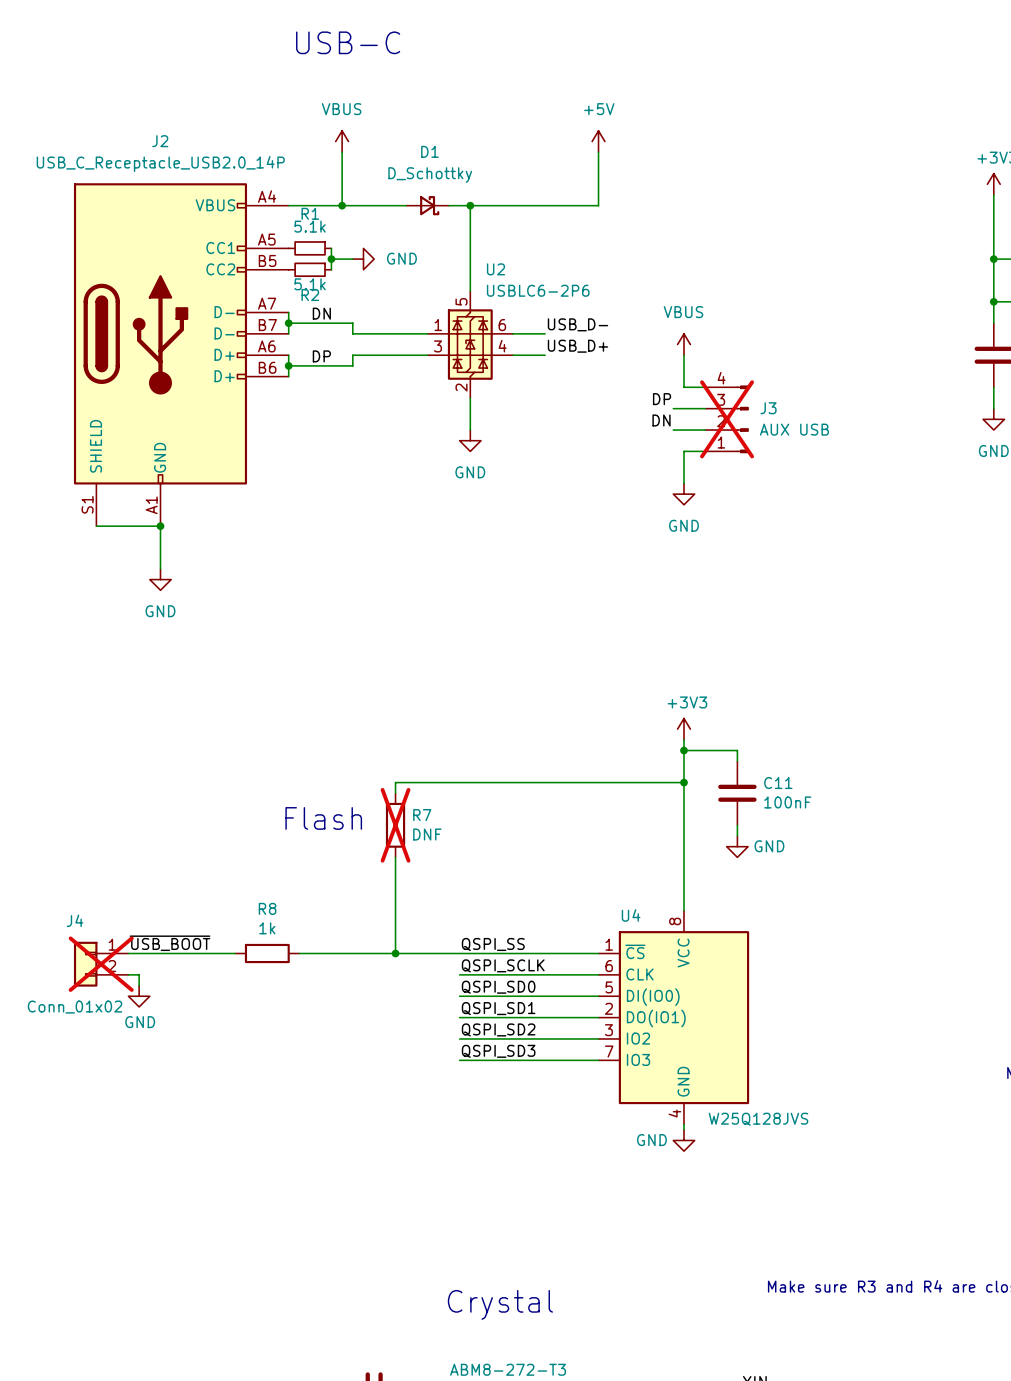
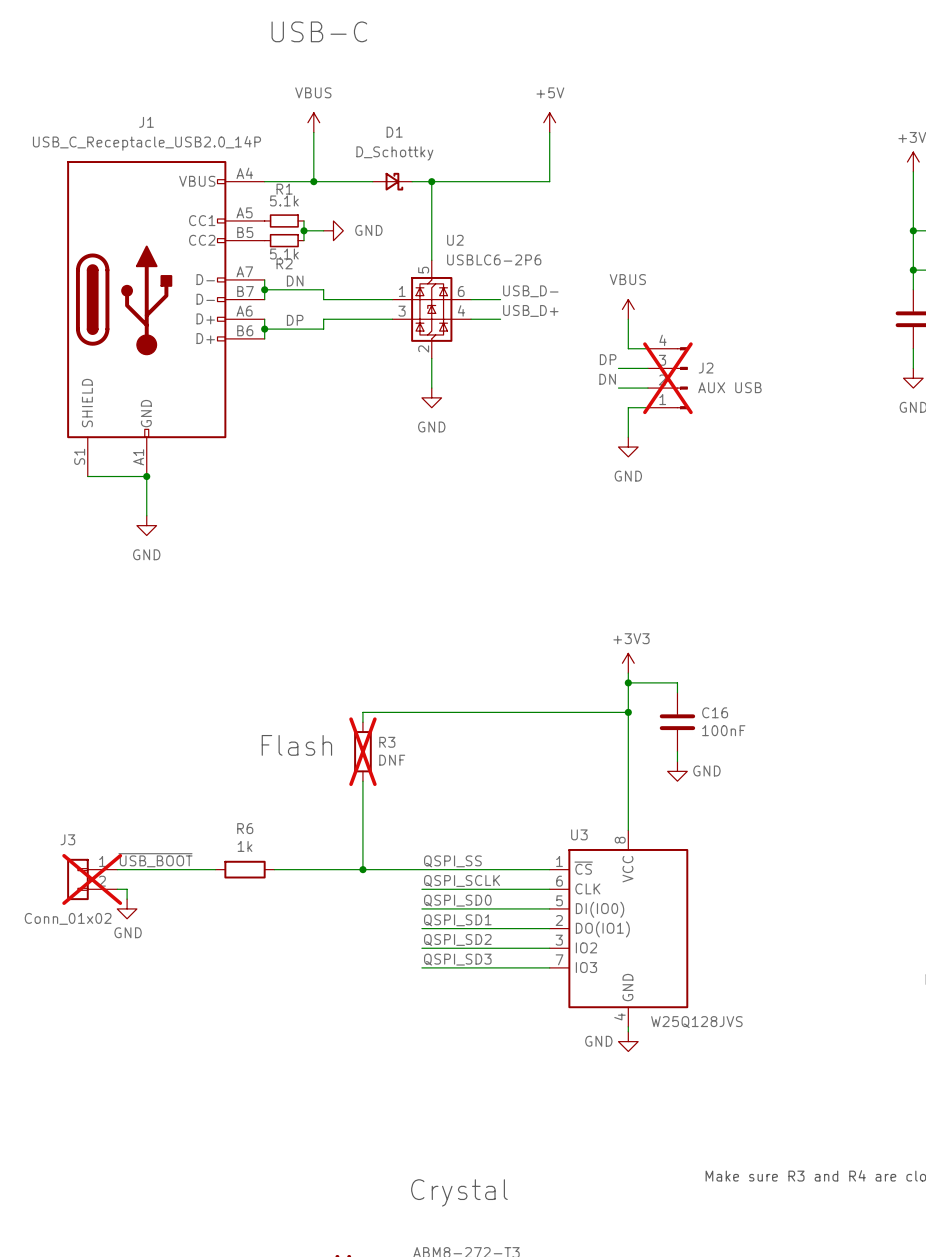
J2 name: J2 (160, 141) -> J1 (146, 122)
J3 name: J3 (768, 408) -> J2 (706, 368)
C11 name: C11 (778, 783) -> C16 (715, 712)
R7 name: R7 (422, 815) -> R3 (387, 742)
R8 name: R8 (267, 908) -> R6 (245, 828)
U4 name: U4 (631, 915) -> U3 (579, 834)
J4 name: J4 (75, 920) -> J3 (67, 839)

